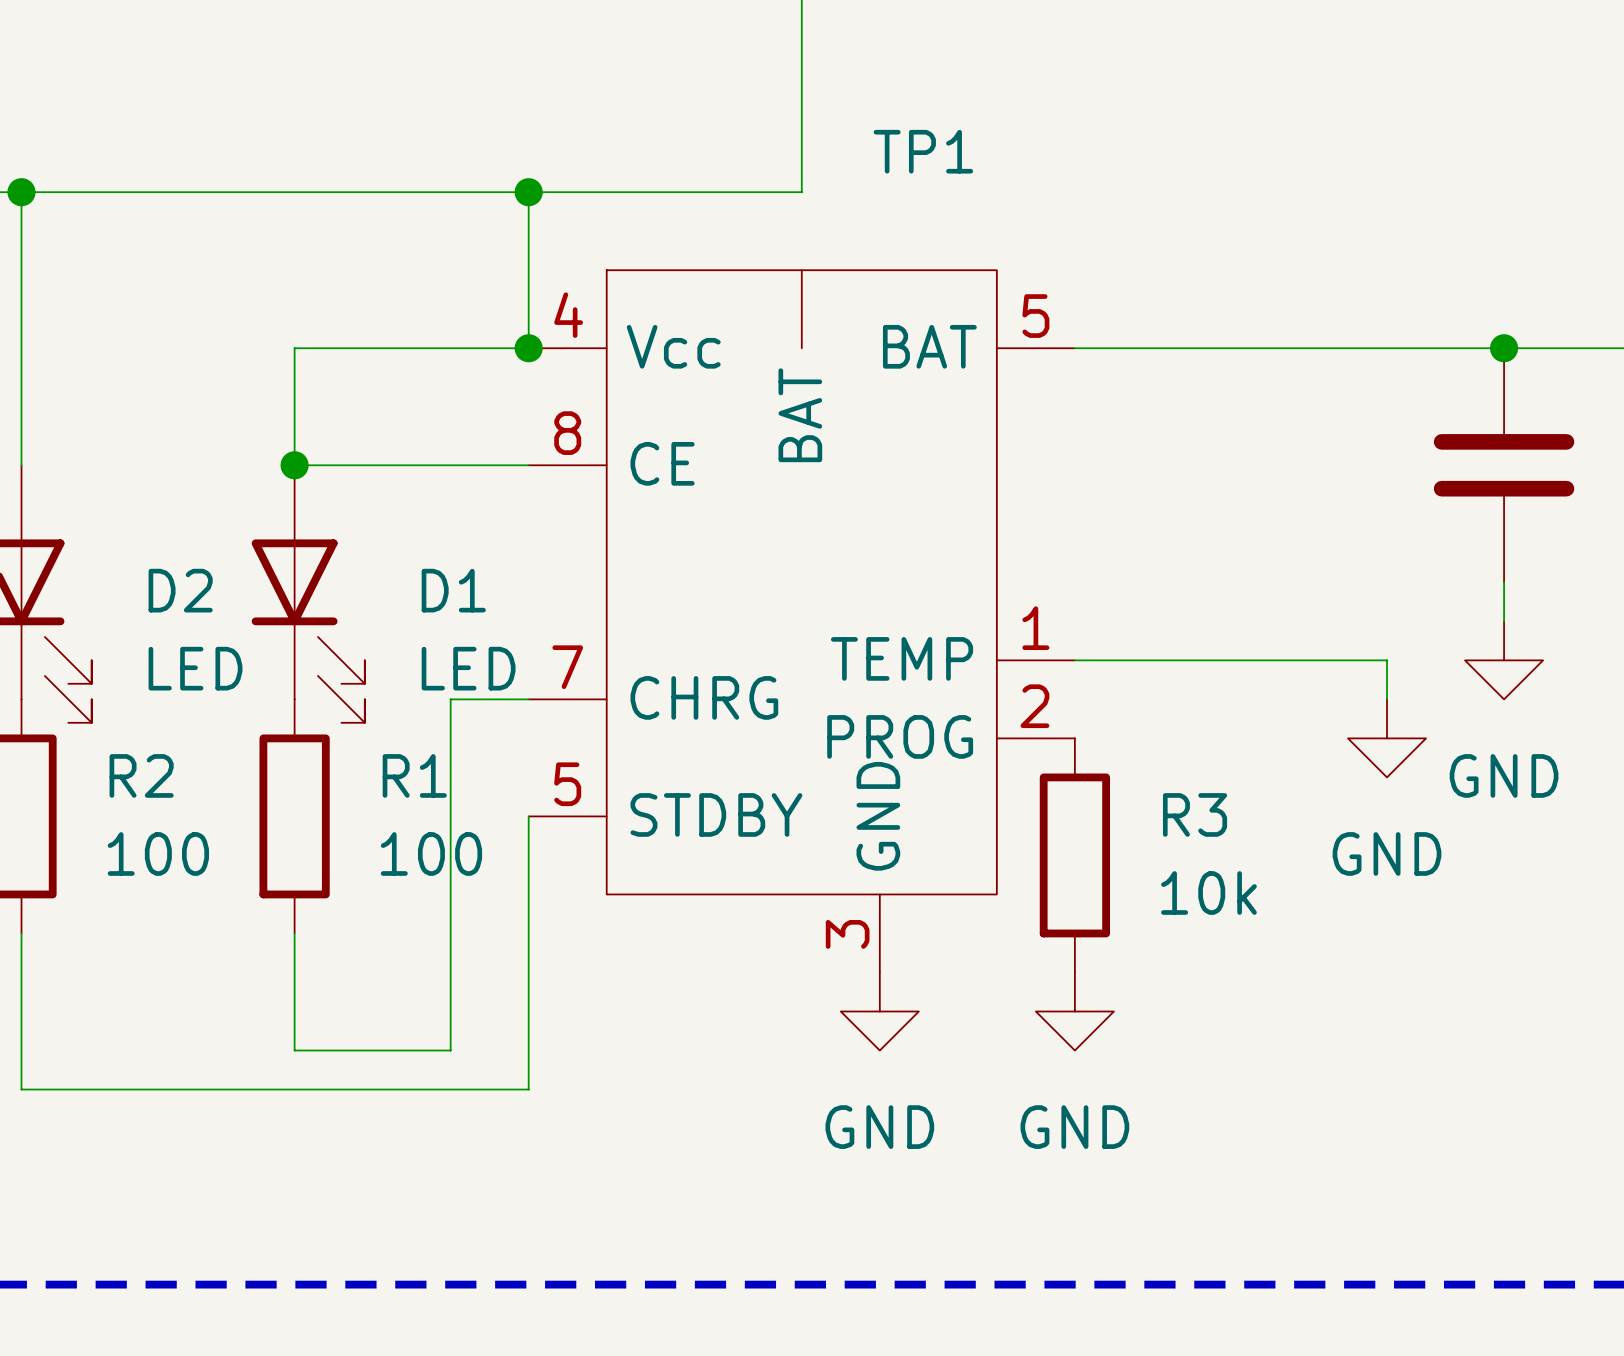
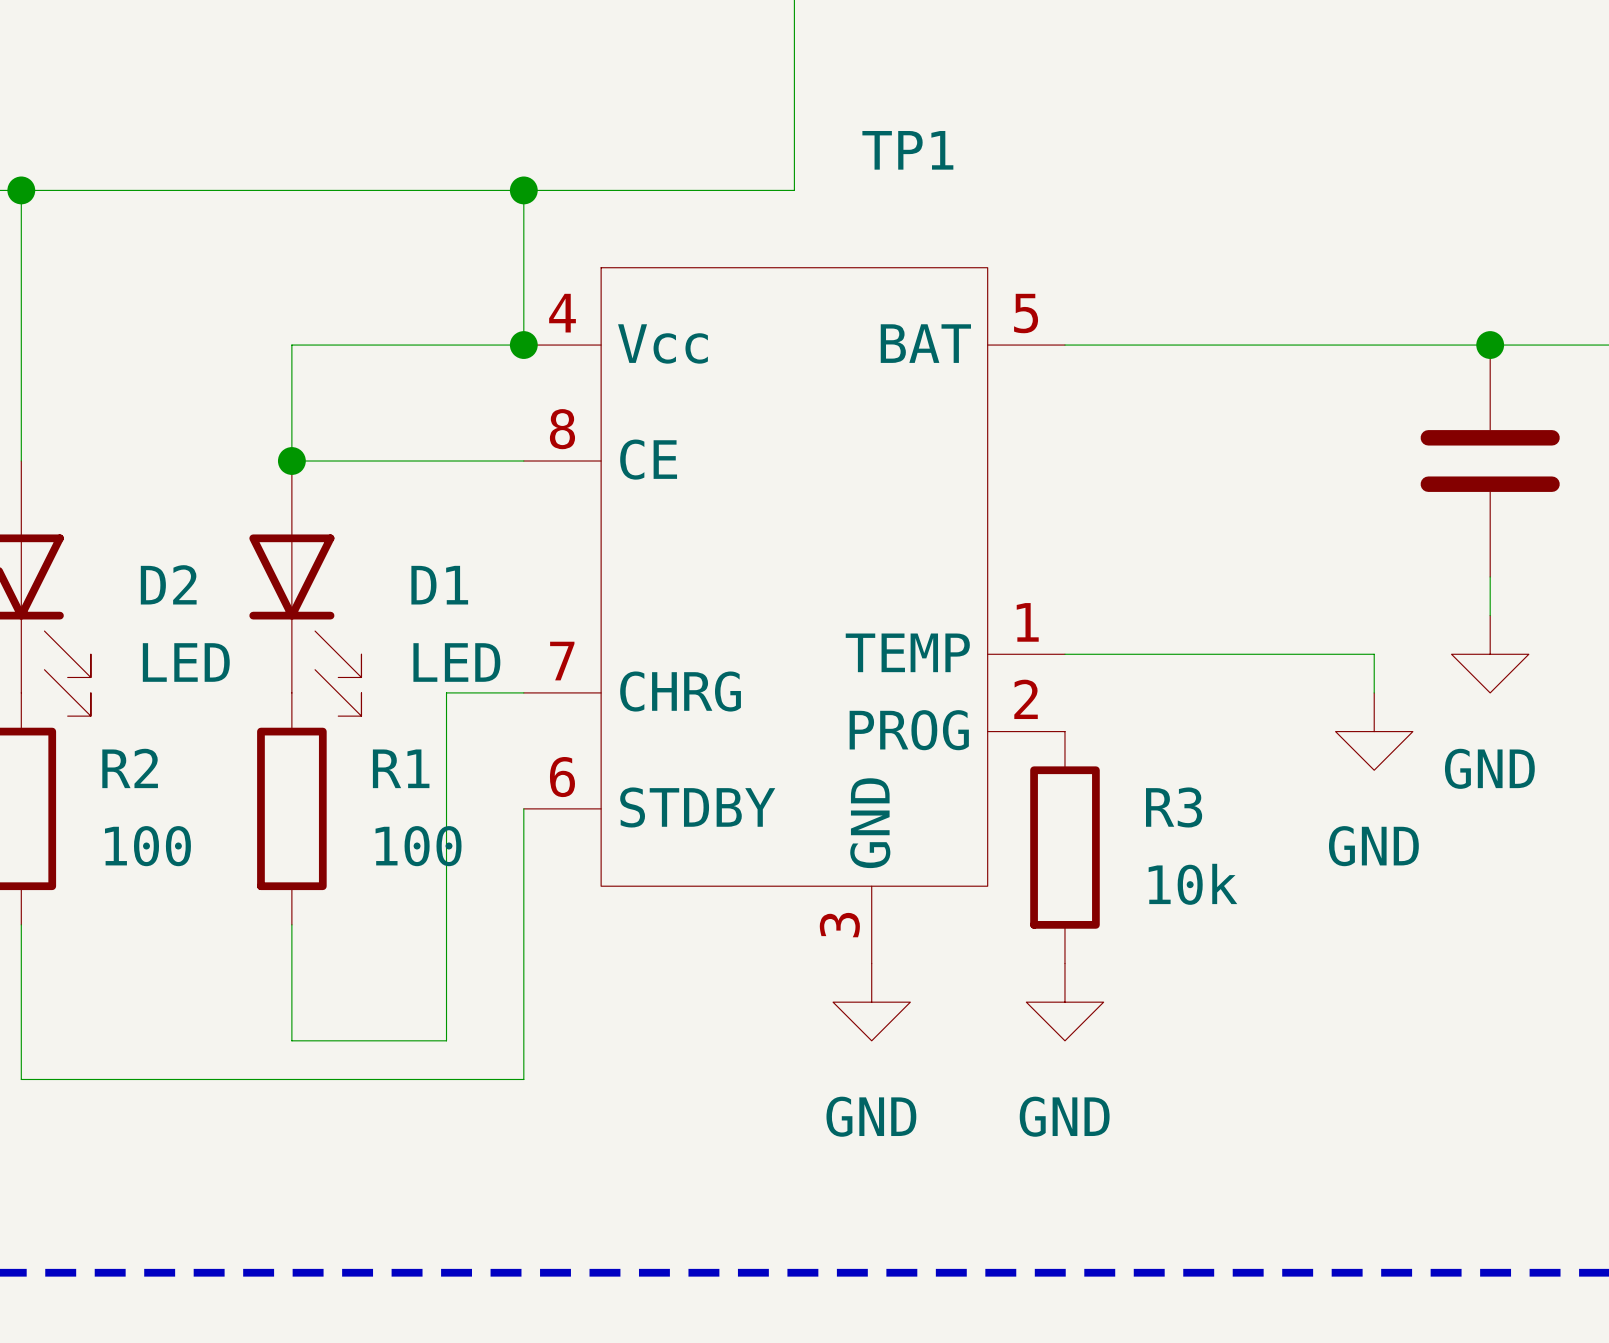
TP1 symbol: [528, 270, 1075, 973] -> [523, 267, 1065, 964]

